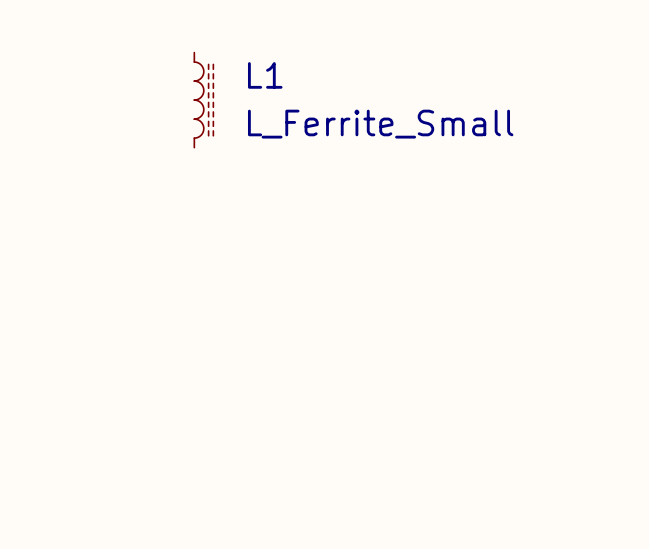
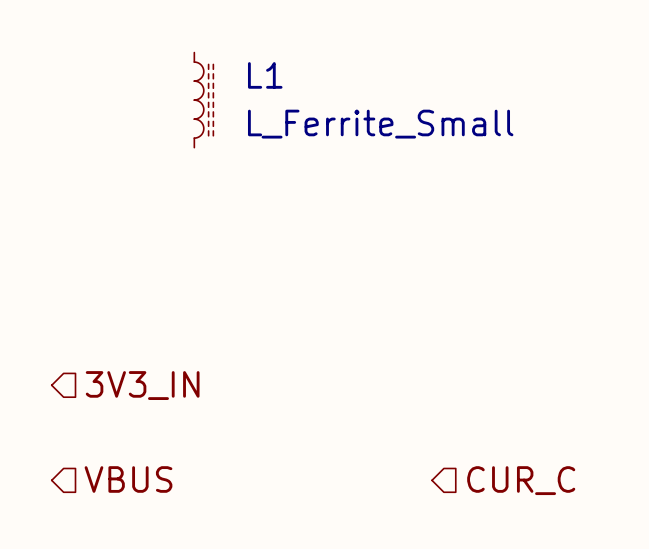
hierarchical label: none -> 3V3_IN (142, 385)
hierarchical label: none -> VBUS (128, 479)
hierarchical label: none -> CUR_C (521, 480)

